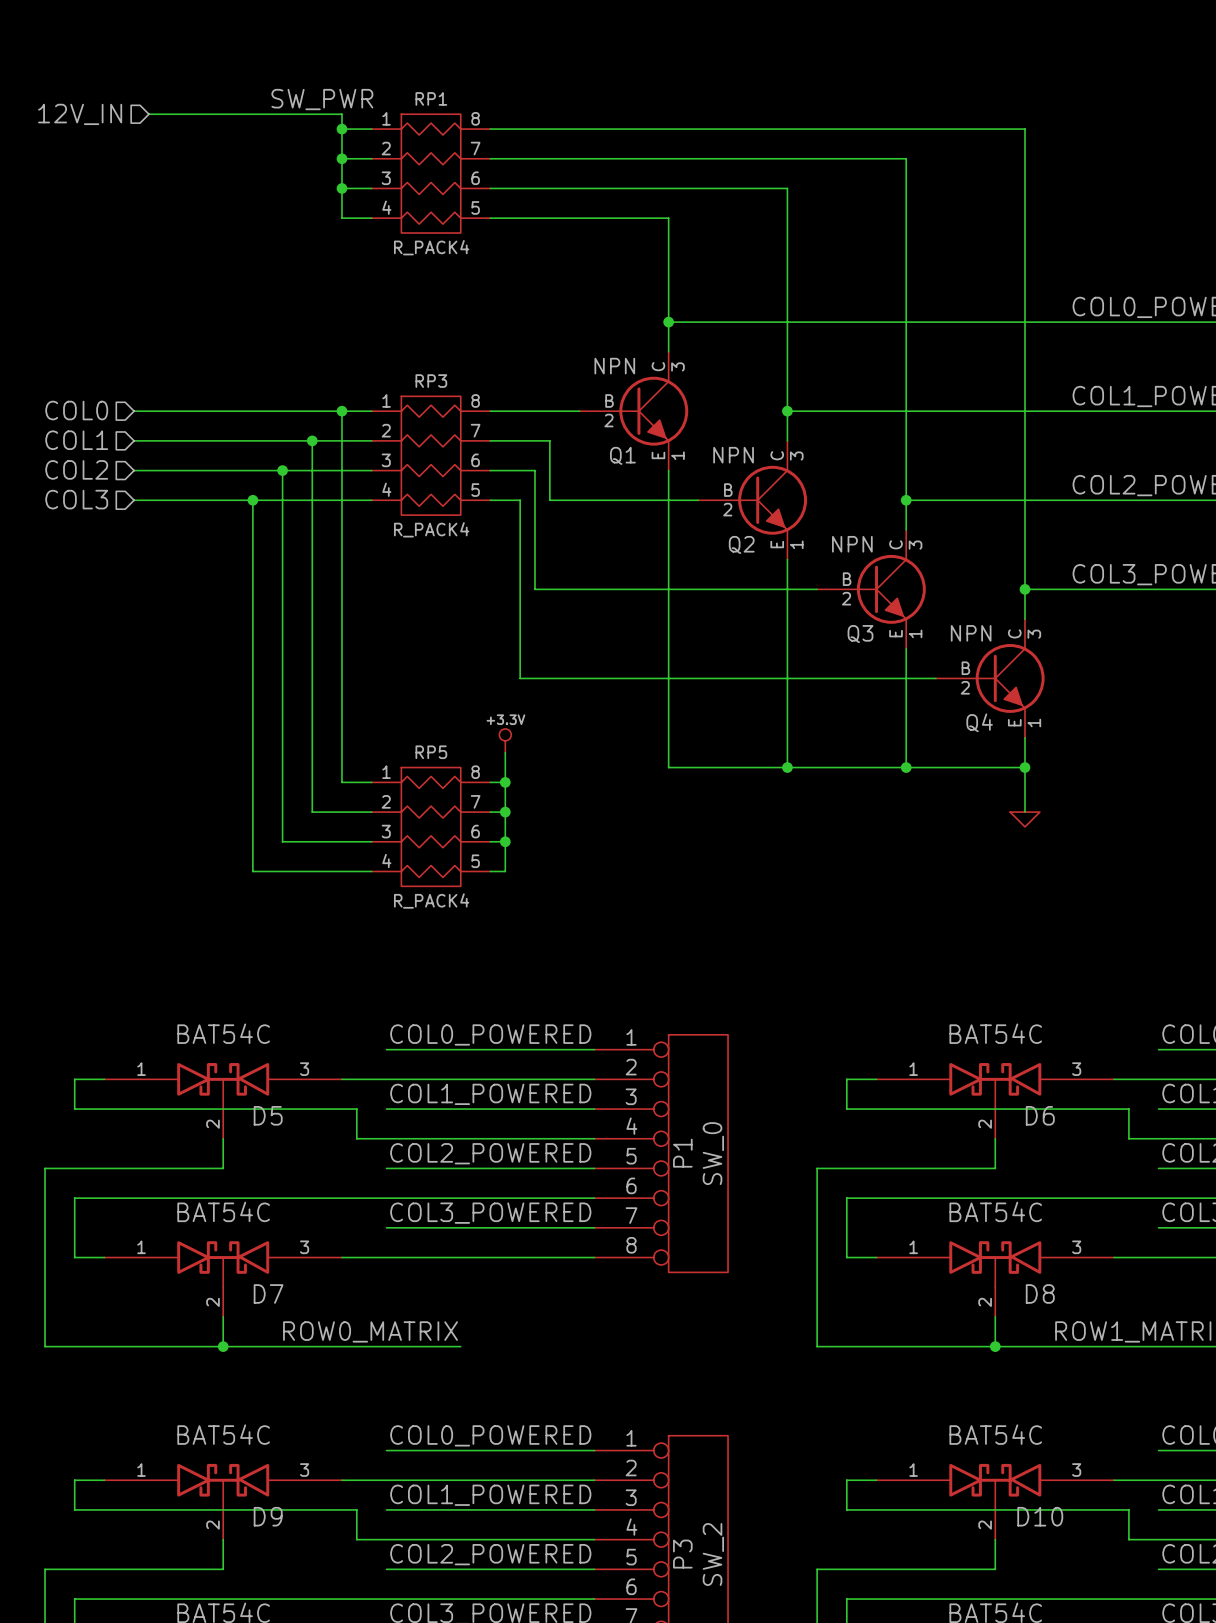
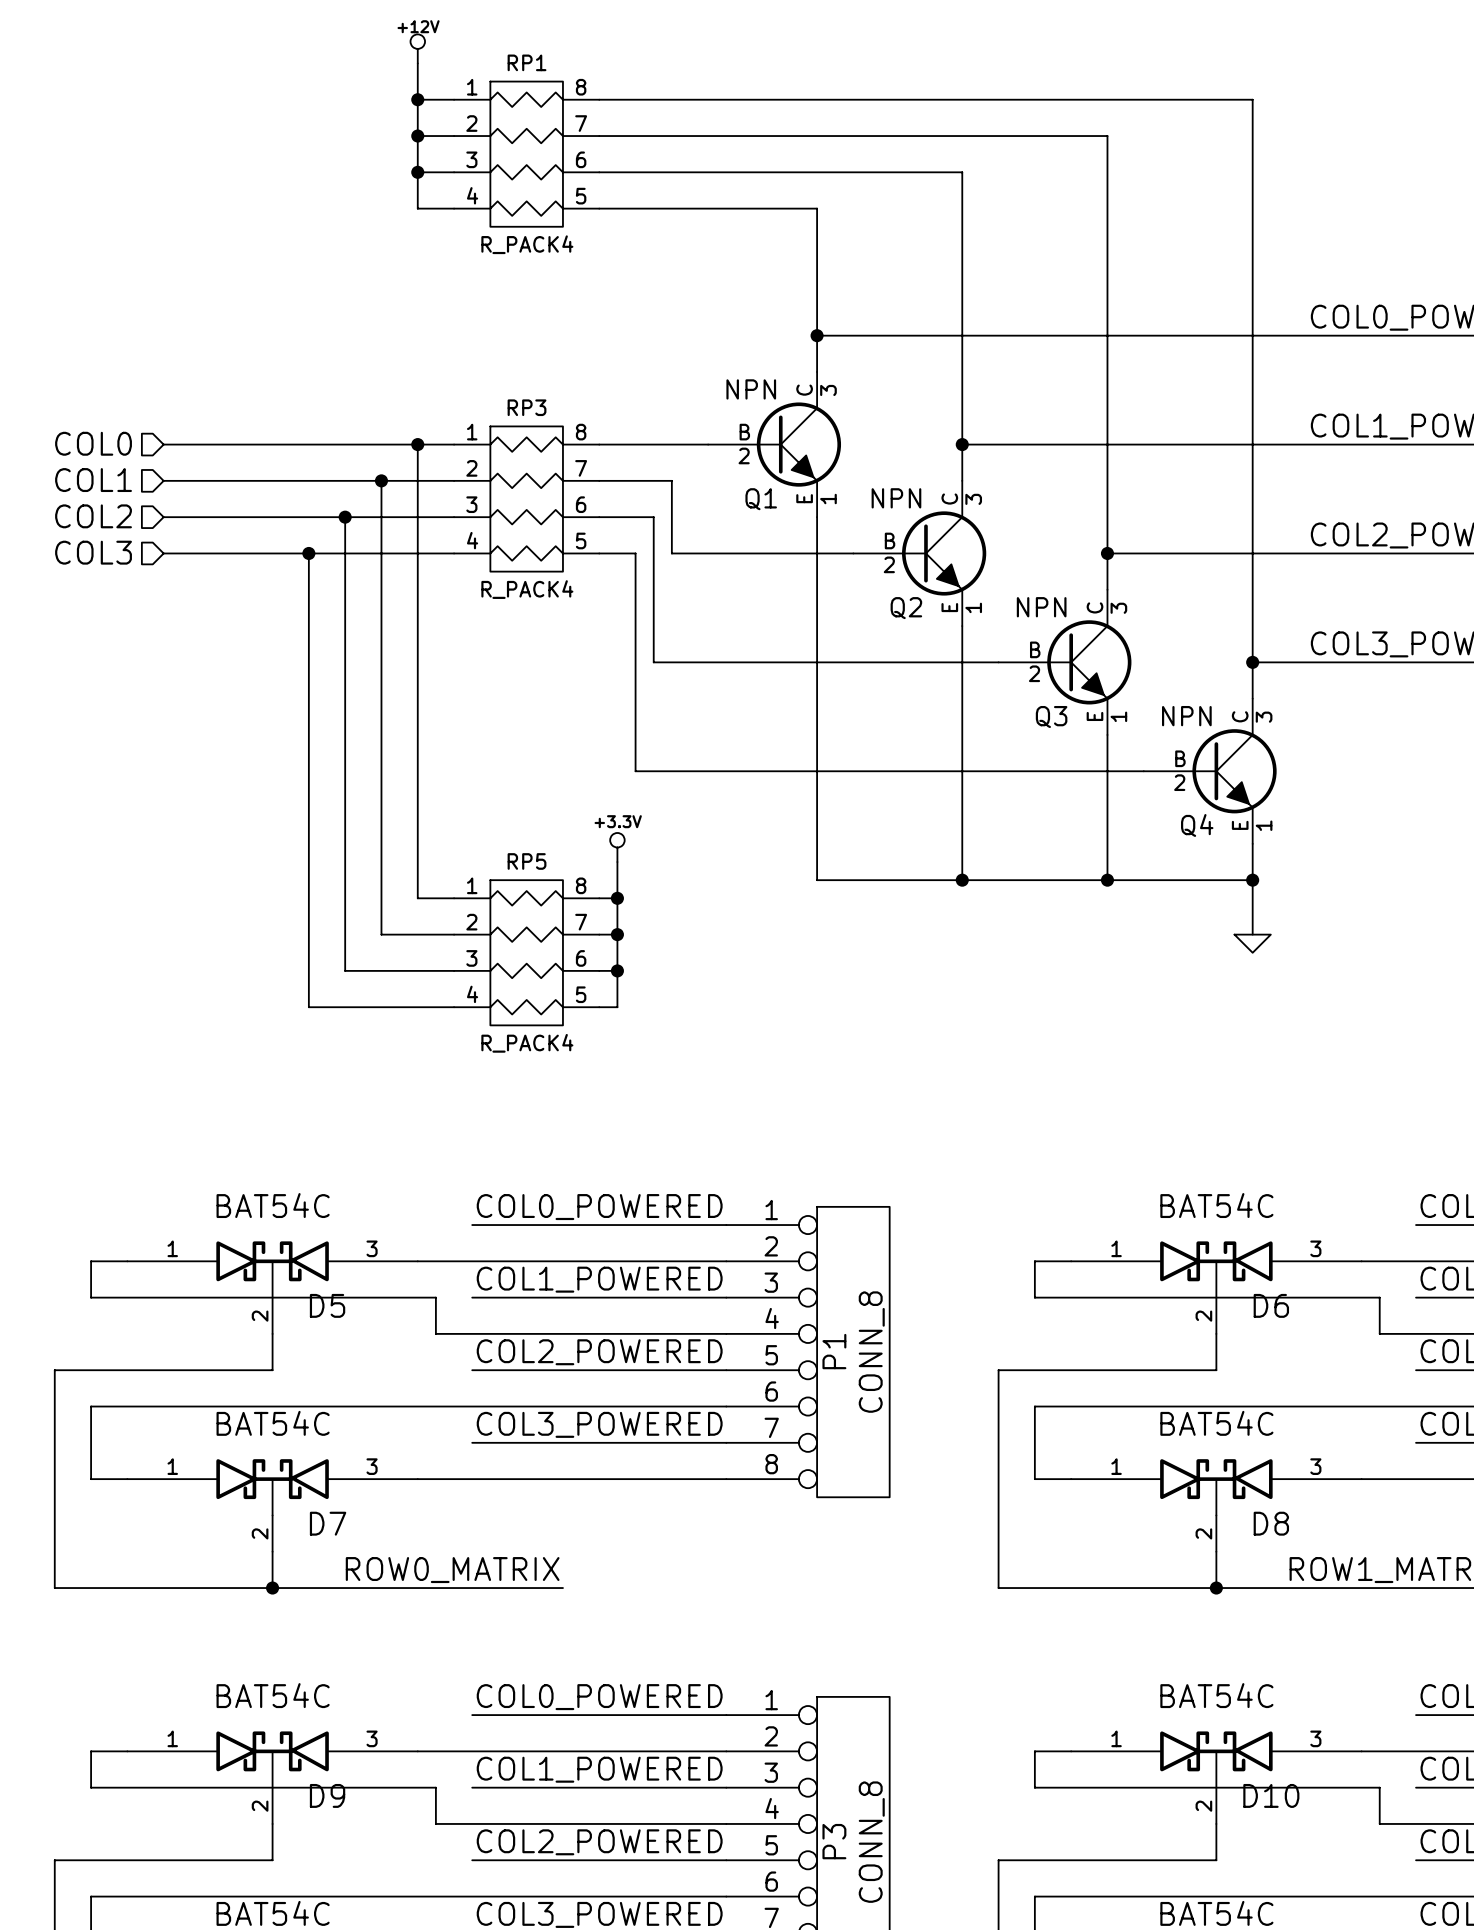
power symbol: none -> +12V (417, 48)
label: SW_PWR (322, 99) -> none
hierarchical label: 12V_IN (80, 114) -> none
wire: (148, 114) (341, 114) -> (417, 63) (417, 81)
P1 value: SW_0 (713, 1153) -> CONN_8 (871, 1352)
P3 value: SW_2 (713, 1554) -> CONN_8 (871, 1842)

